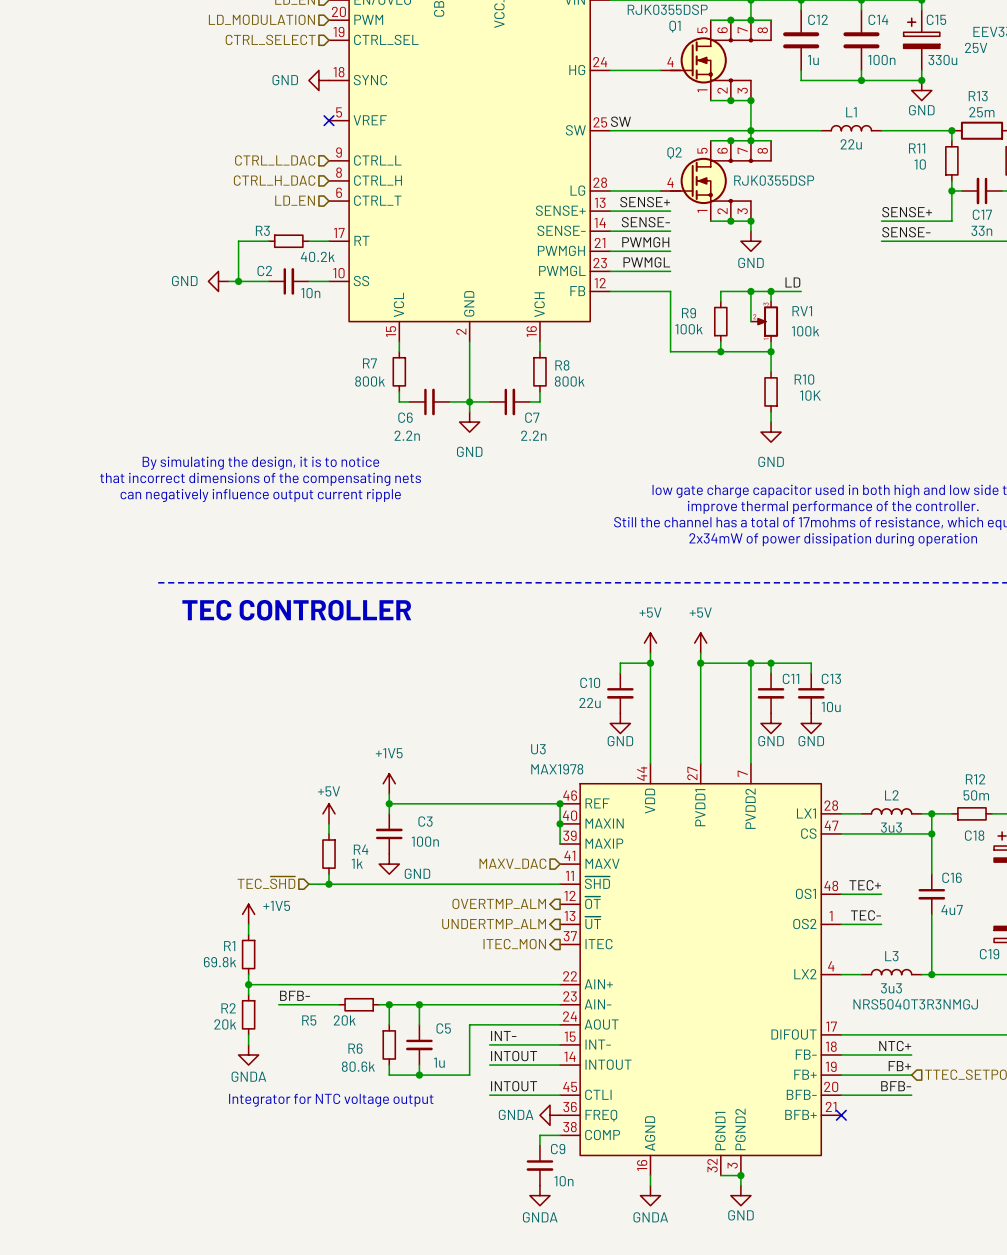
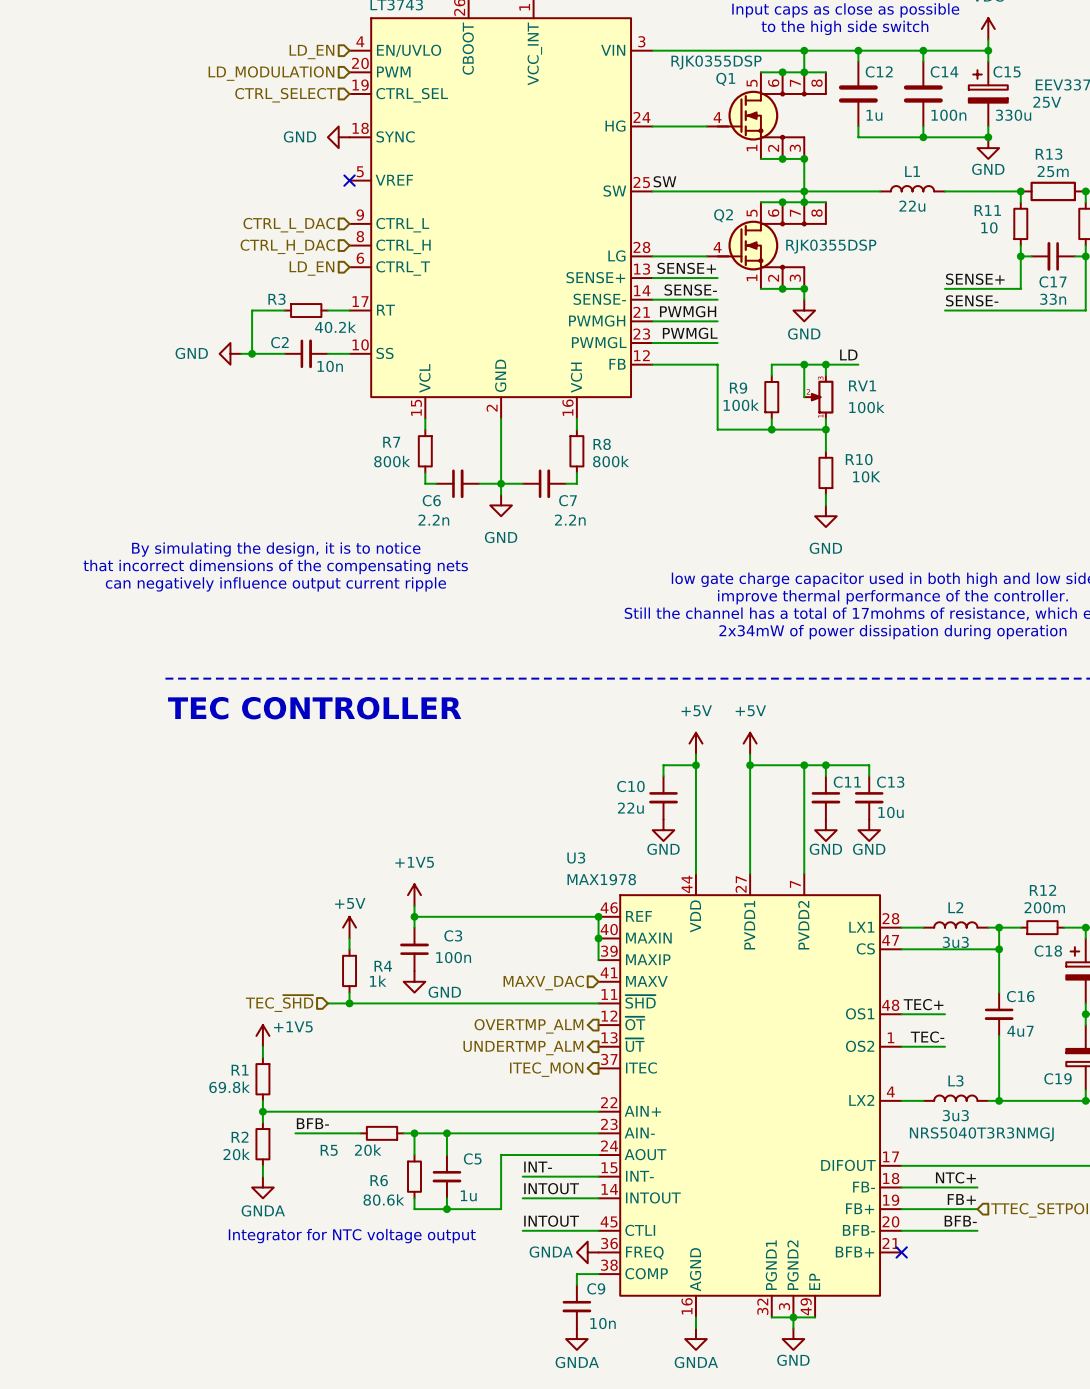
U3 symbol: [560, 763, 842, 1176] -> [598, 873, 902, 1318]
R12 value: 50m (976, 795) -> 200m (1044, 907)
wire: none -> (793, 1317) (815, 1317)

